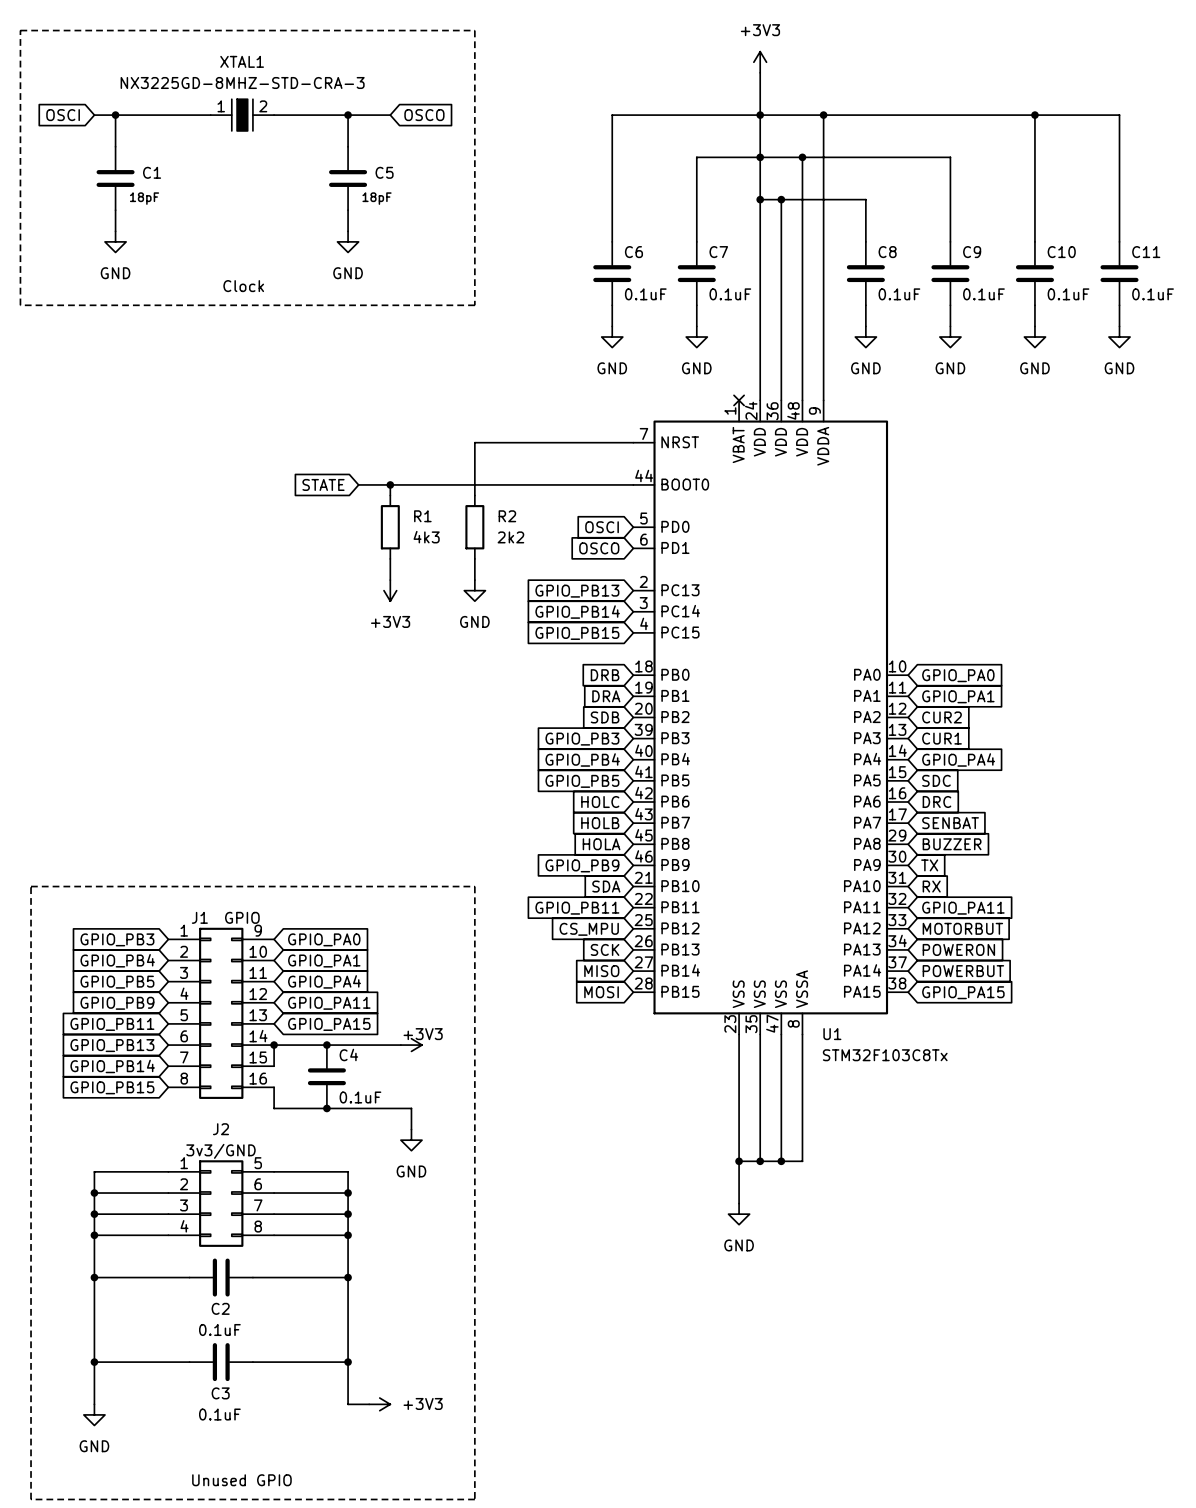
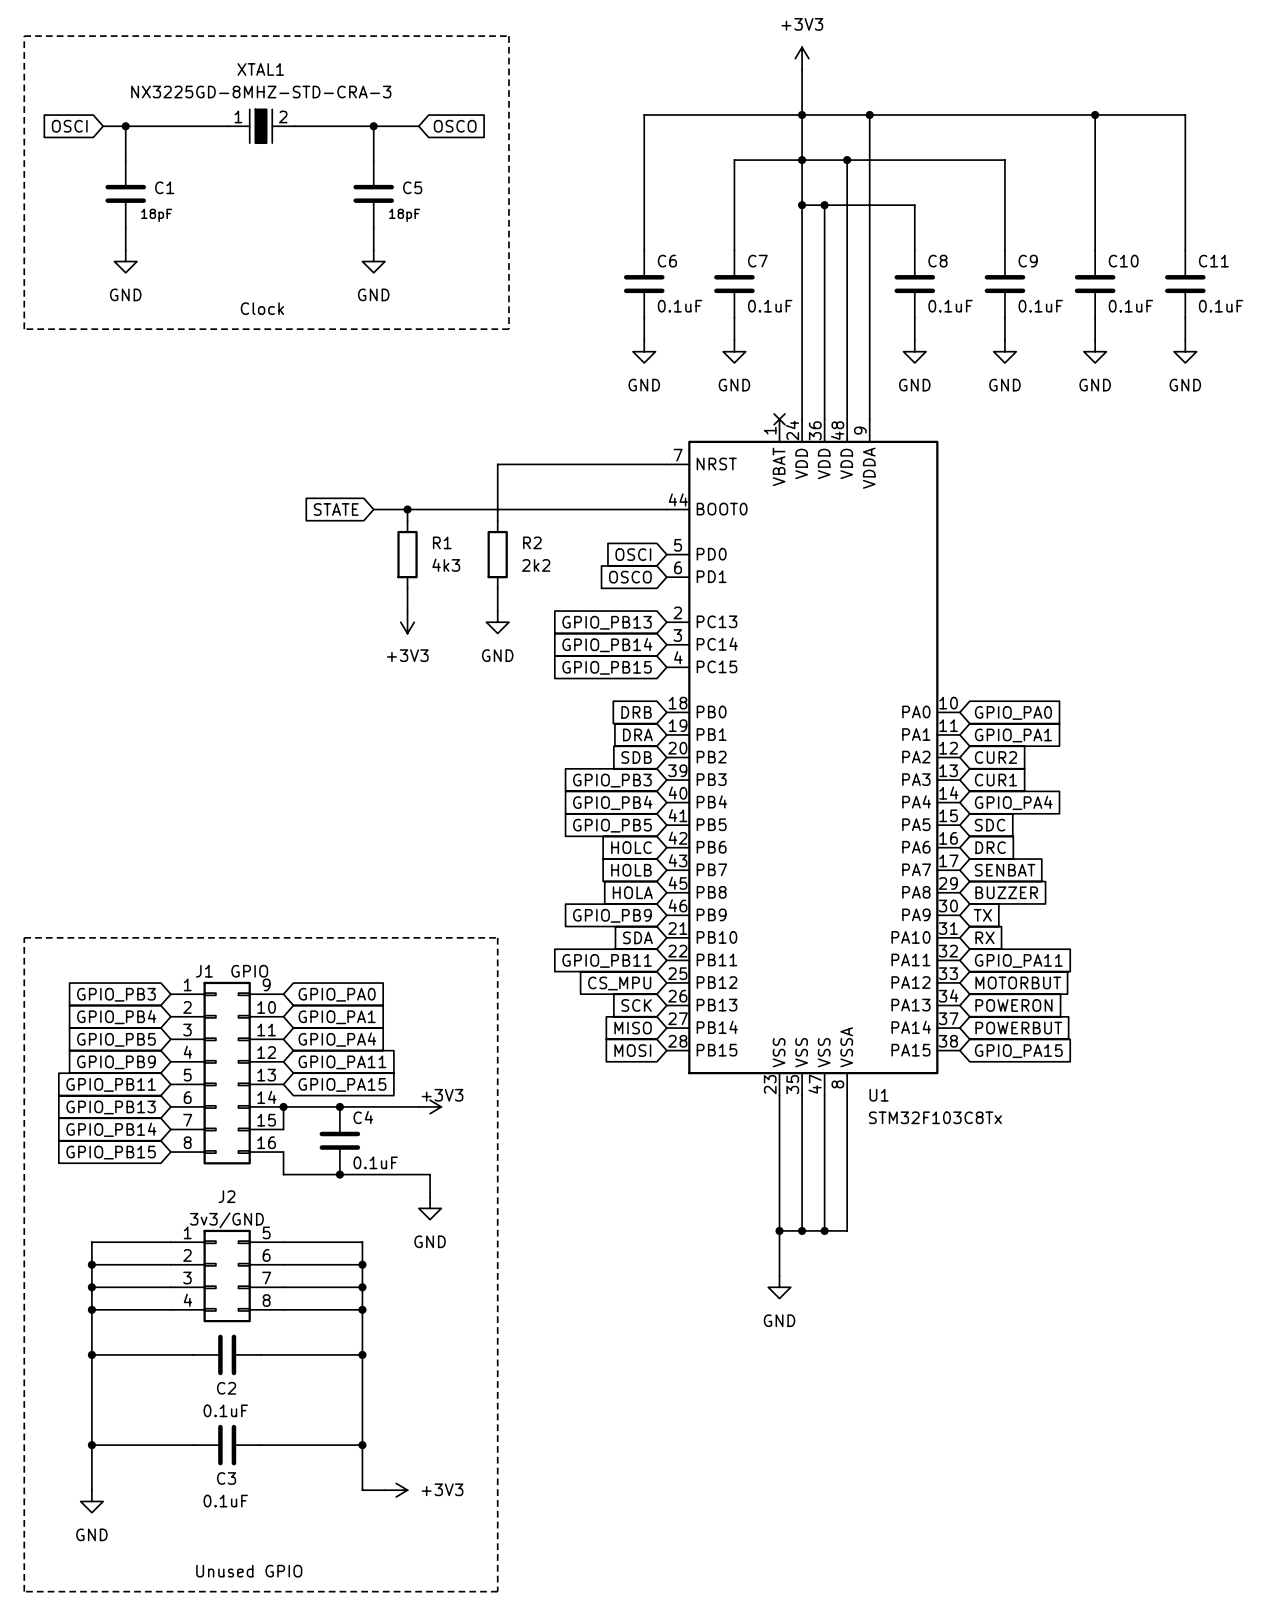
line: (20, 30) (474, 30) (474, 305) (20, 305) (20, 30) -> (24, 36) (508, 36) (508, 329) (24, 329) (24, 36)
global label position: OSCI (63, 115) -> OSCI (69, 126)
wire: (94, 115) (210, 115) -> (103, 126) (227, 126)
wire: (115, 115) (115, 146) -> (125, 126) (125, 160)
junction position: (115, 115) -> (125, 126)
XTAL1 position: (242, 115) -> (260, 126)
wire: (274, 115) (390, 115) -> (294, 126) (418, 126)
wire: (348, 115) (348, 146) -> (373, 126) (373, 160)
junction position: (348, 115) -> (373, 126)
global label position: OSCO (424, 115) -> OSCO (455, 126)
C1 position: (115, 178) -> (125, 193)
C5 position: (348, 178) -> (373, 193)
wire: (115, 210) (115, 231) -> (125, 227) (125, 250)
wire: (348, 210) (348, 231) -> (373, 227) (373, 250)
power symbol position: GND (115, 241) -> GND (125, 261)
power symbol position: GND (348, 241) -> GND (373, 261)
text position: Clock (243, 286) -> Clock (262, 308)

